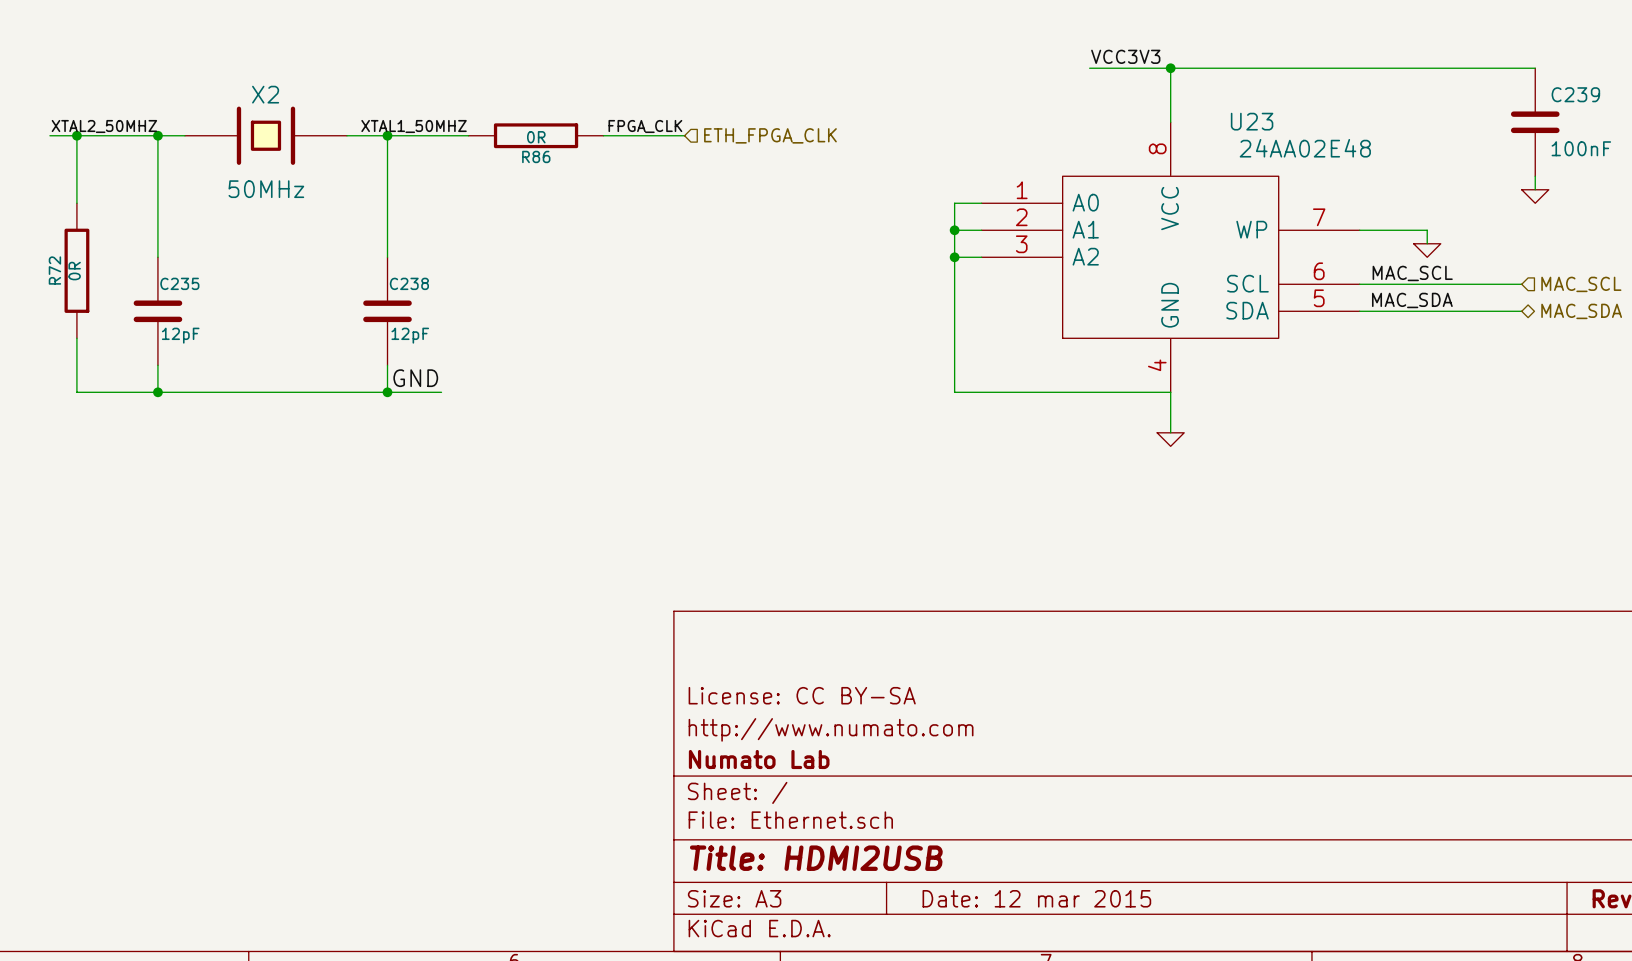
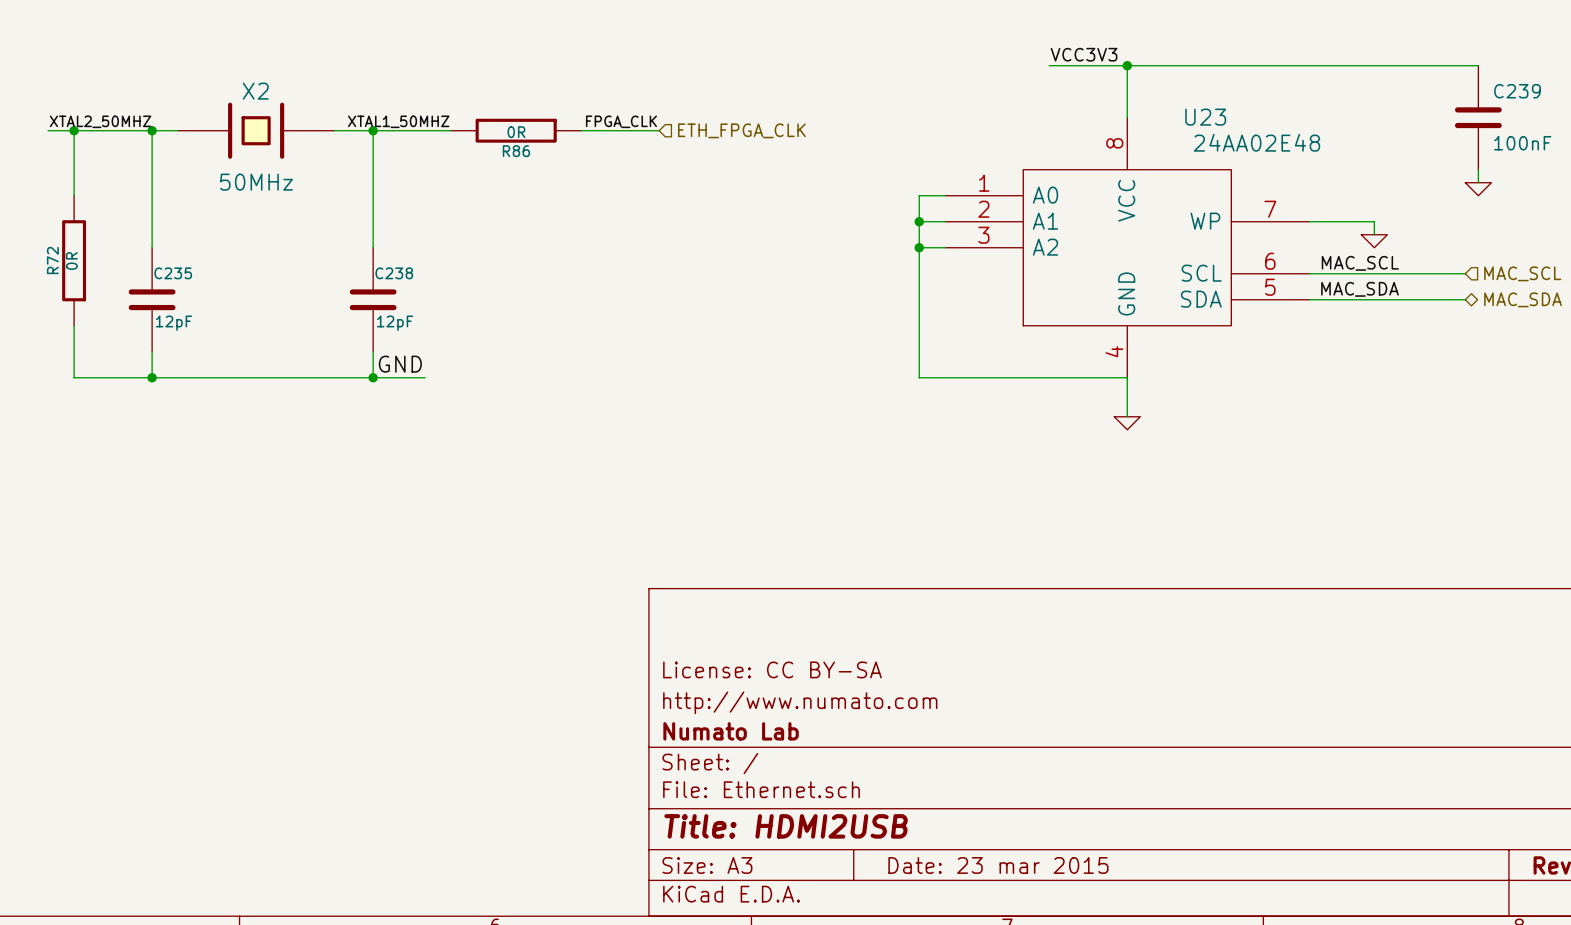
title block: Date: 12 mar 2015 (1036, 898) -> Date: 23 mar 2015 (998, 865)

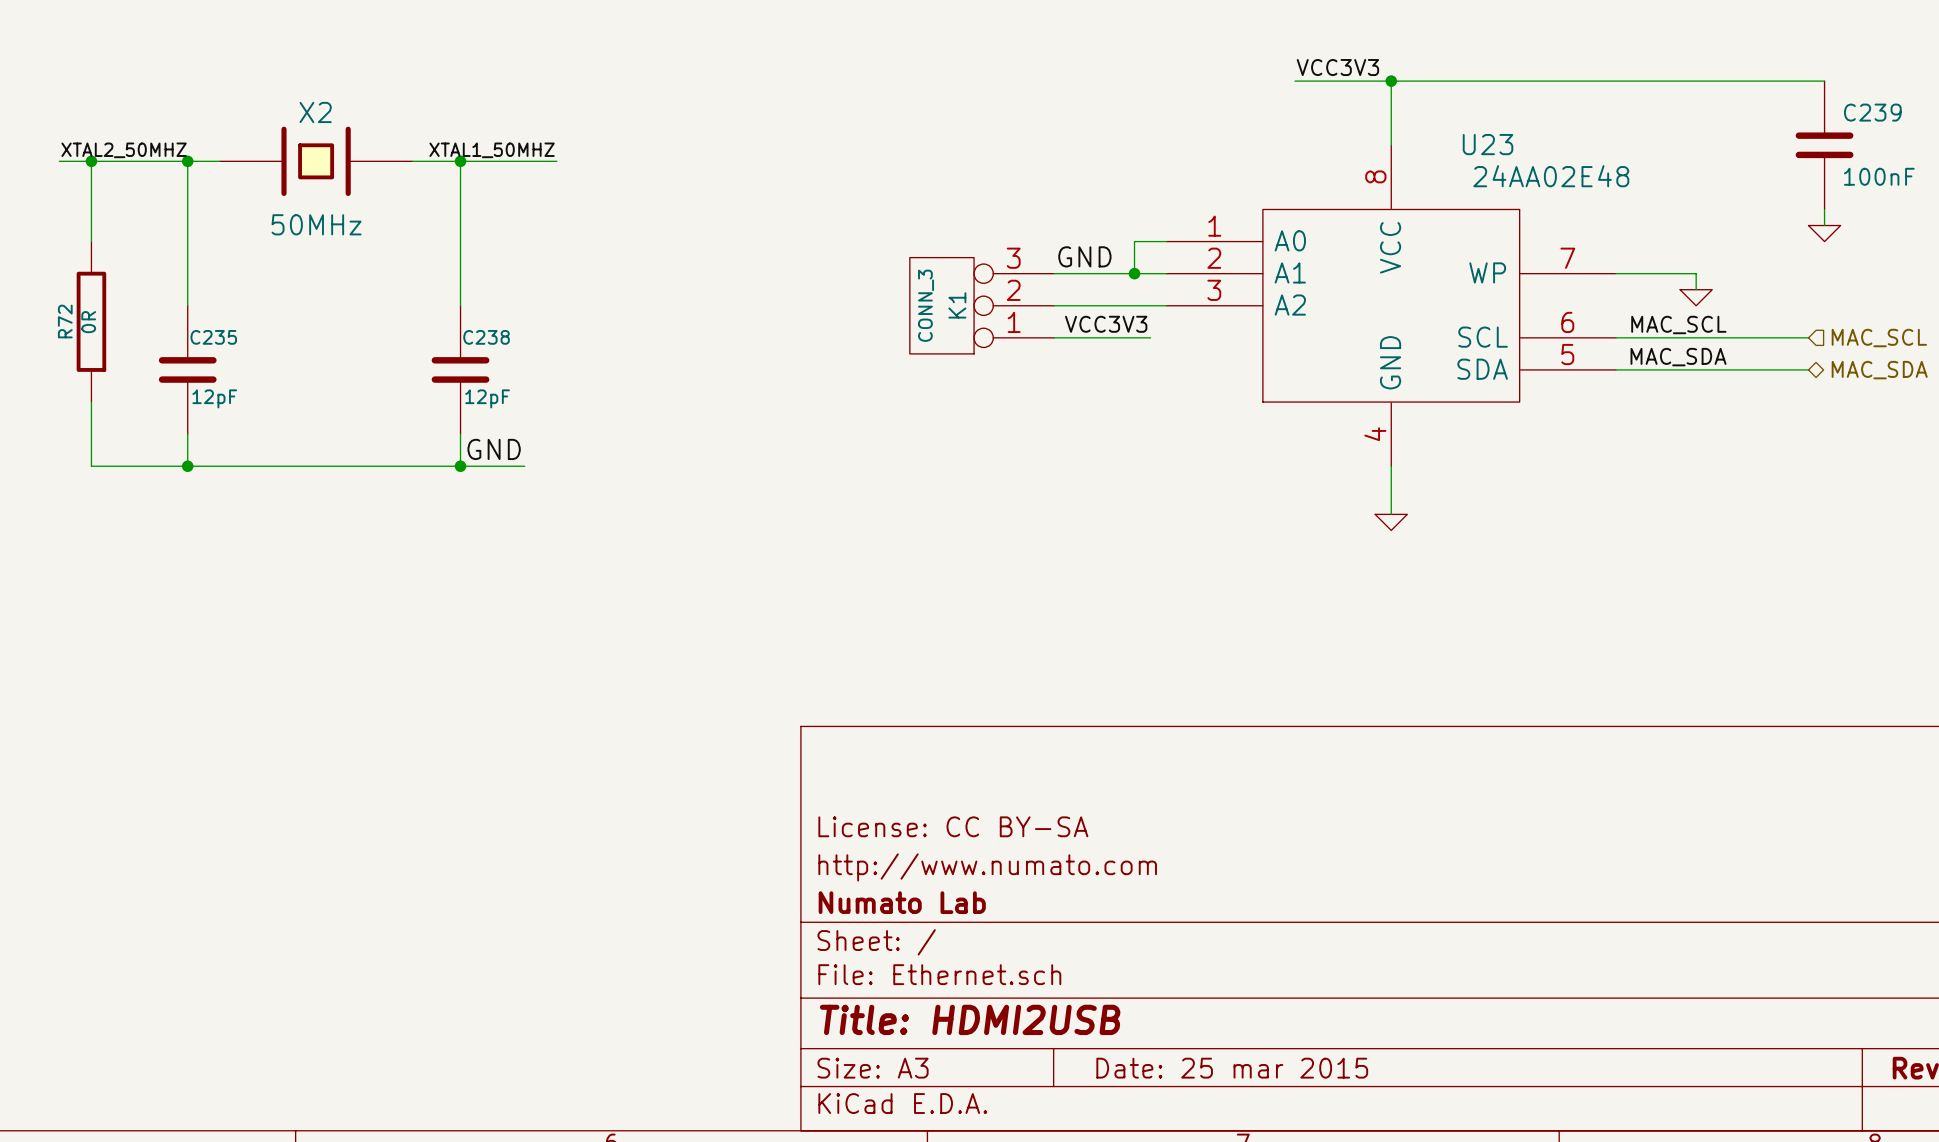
label: FPGA_CLK (621, 121) -> none
R86: 0R (516, 130) -> none
wire: (581, 130) (659, 130) -> none
hierarchical label: ETH_FPGA_CLK (741, 130) -> none
label: none -> GND (1084, 256)
wire: (919, 221) (919, 377) (1127, 377) -> (1134, 273) (1054, 273)
K1: none -> CONN_3 (982, 305)
wire: none -> (1054, 305) (1134, 305)
junction: (919, 247) -> none
label: none -> VCC3V3 (1106, 324)
wire: none -> (1054, 337) (1150, 337)
title block: Date: 23 mar 2015 (998, 865) -> Date: 25 mar 2015 (1232, 1068)

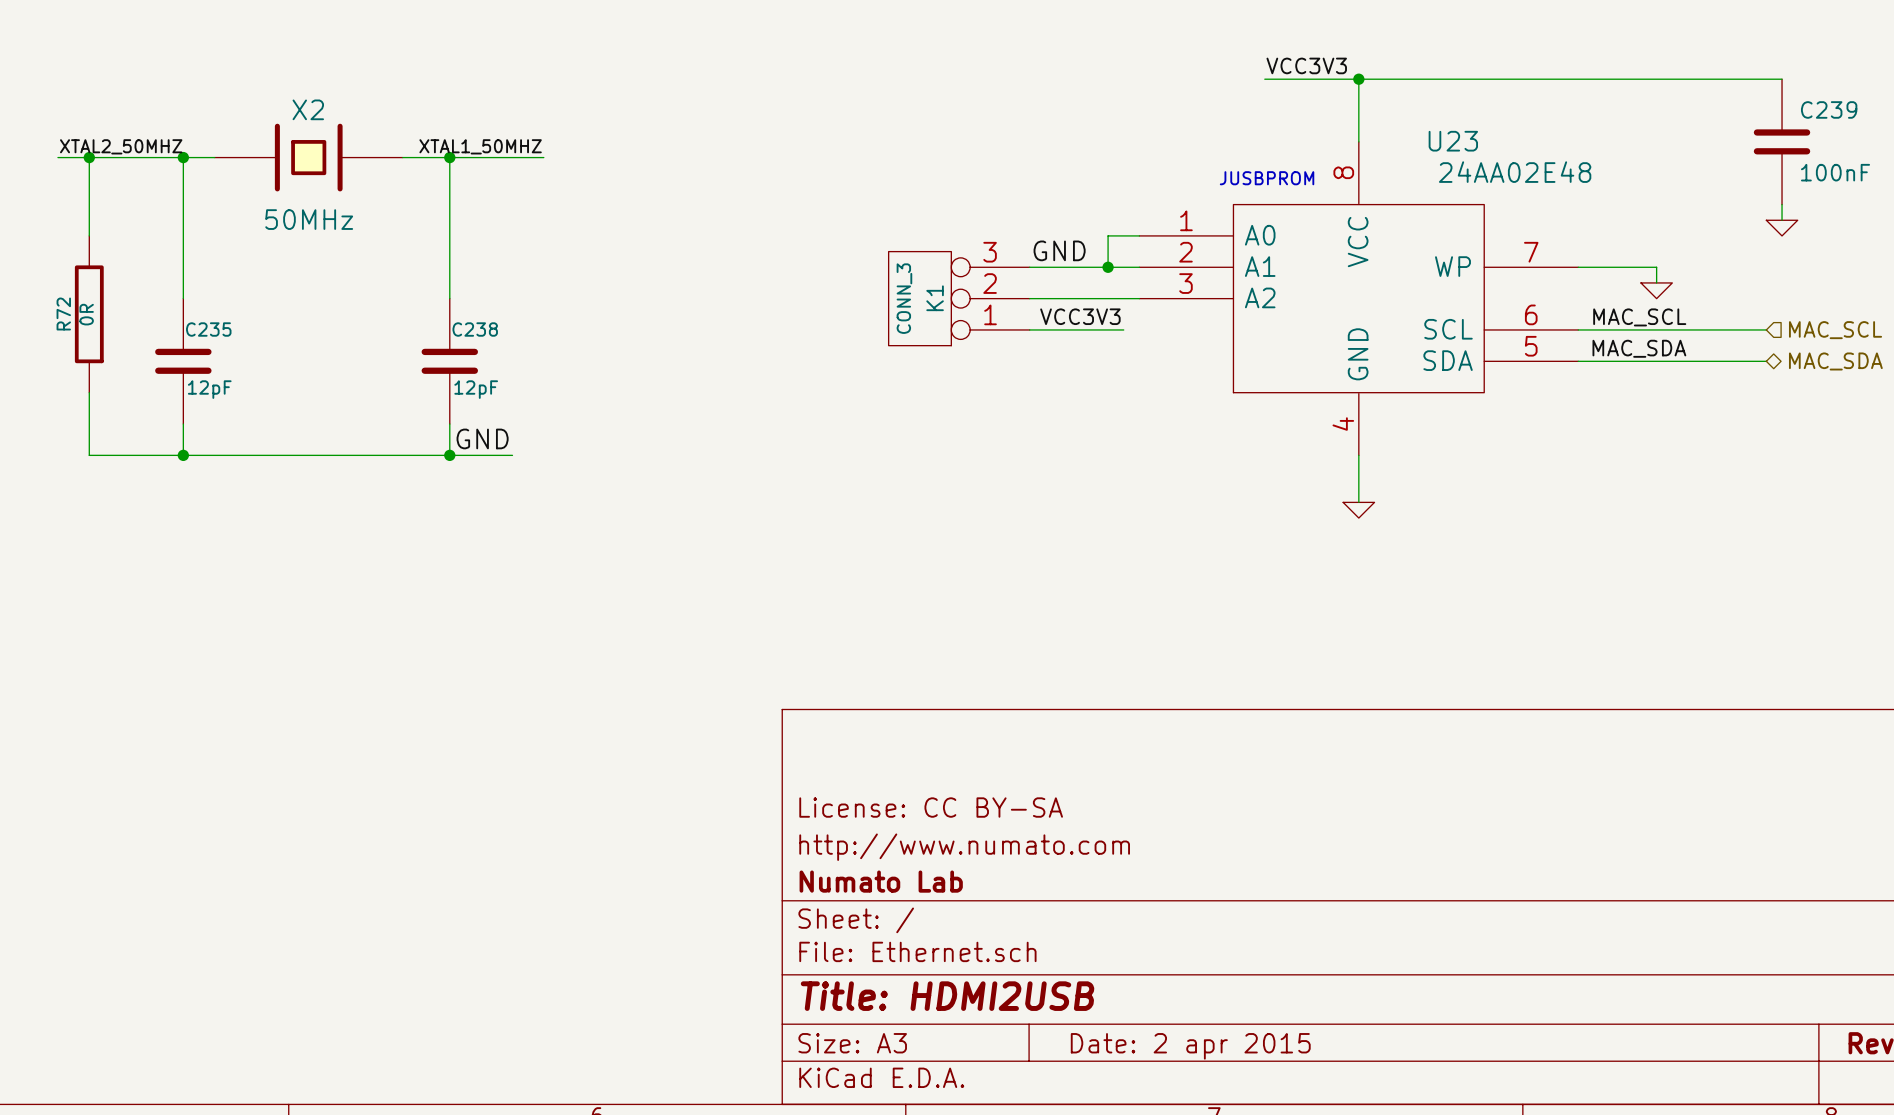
text: none -> JUSBPROM (1267, 178)
title block: Date: 25 mar 2015 (1232, 1068) -> Date: 2 apr 2015 (1190, 1046)

